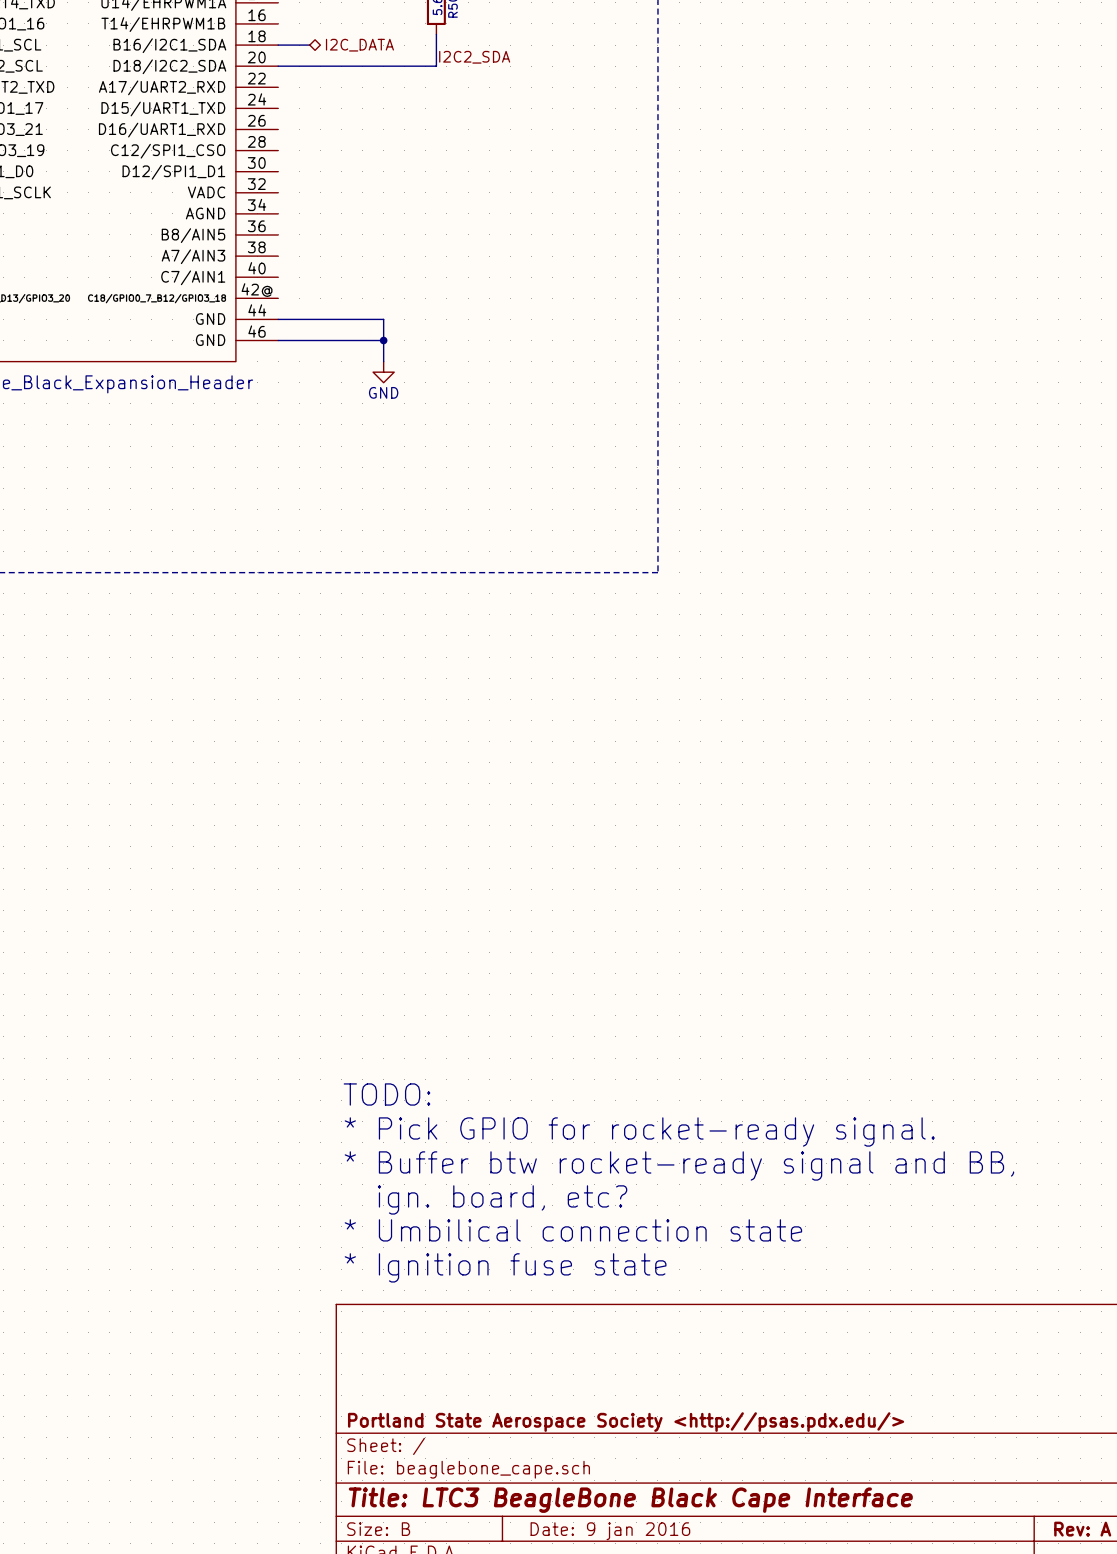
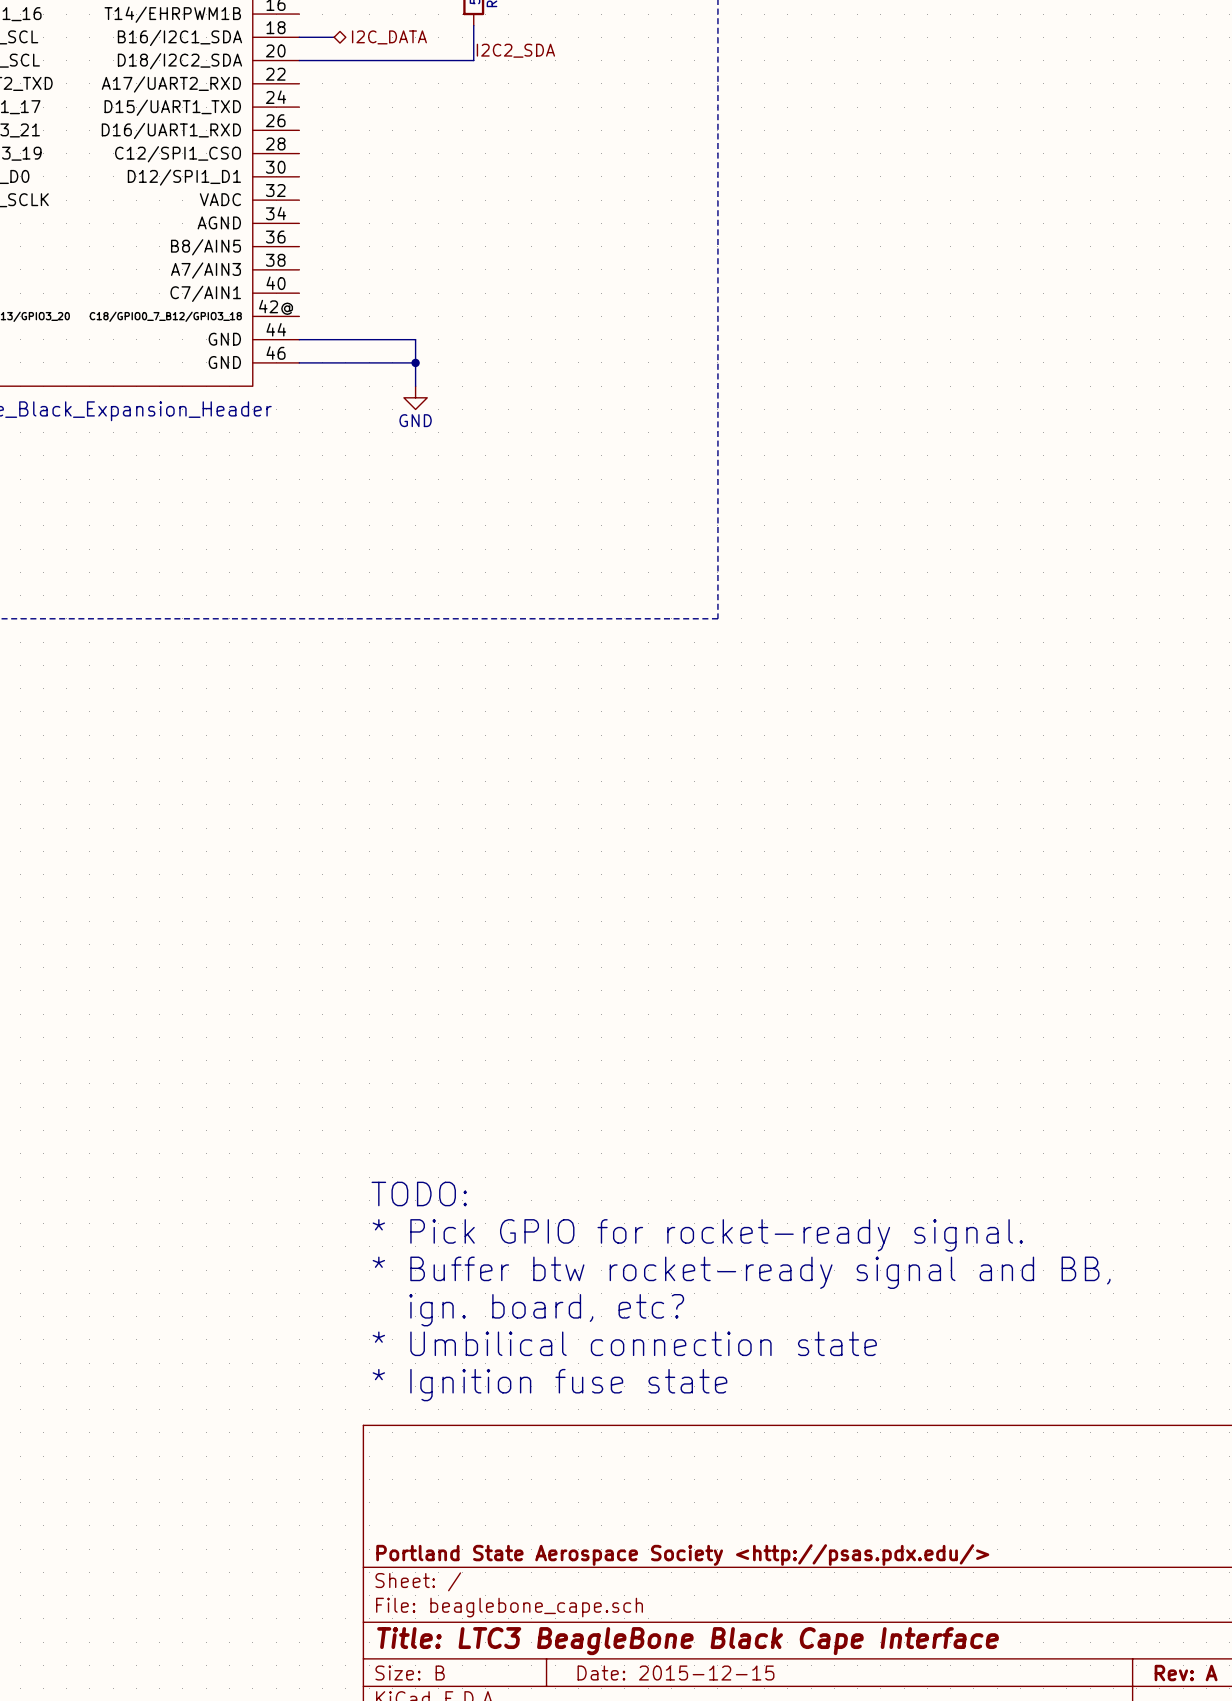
title block: Date: 9 jan 2016 (610, 1531) -> Date: 2015-12-15 (675, 1673)

